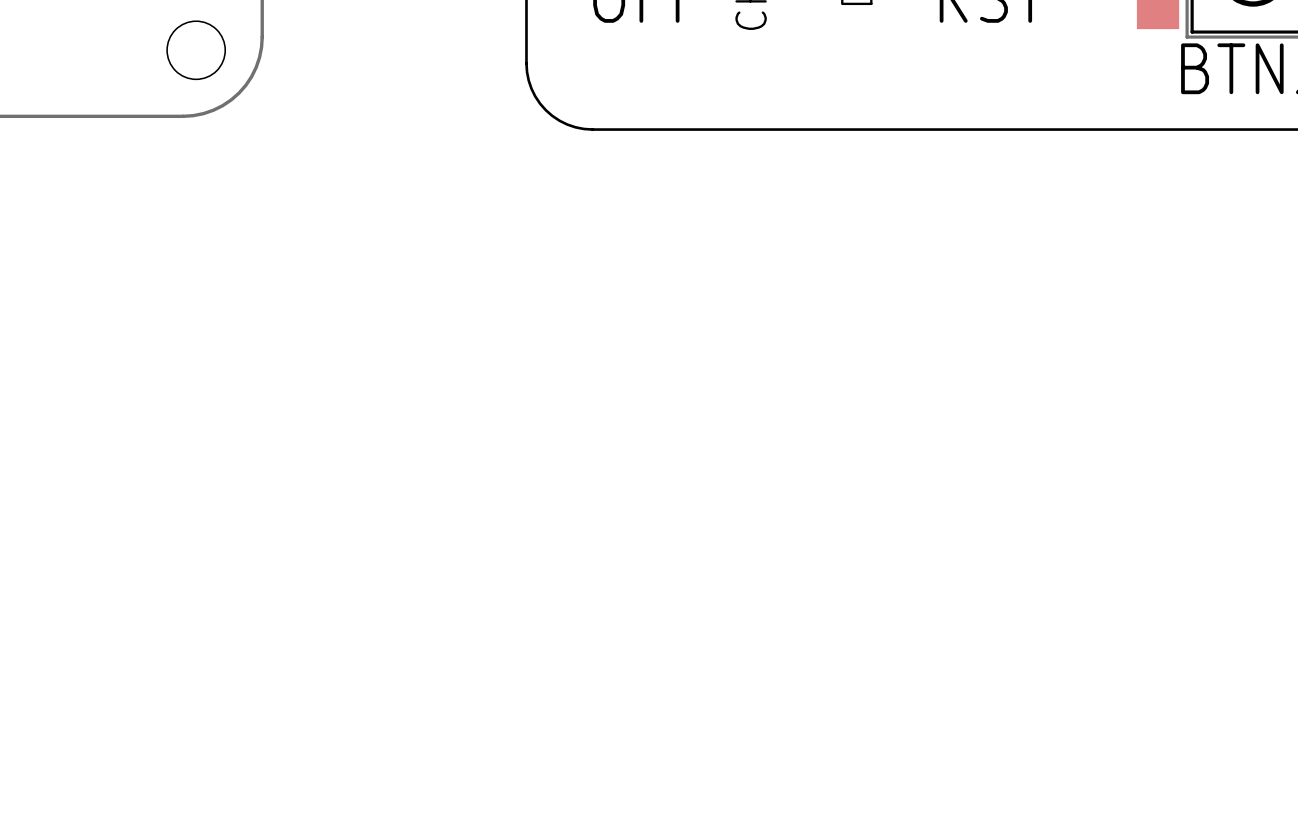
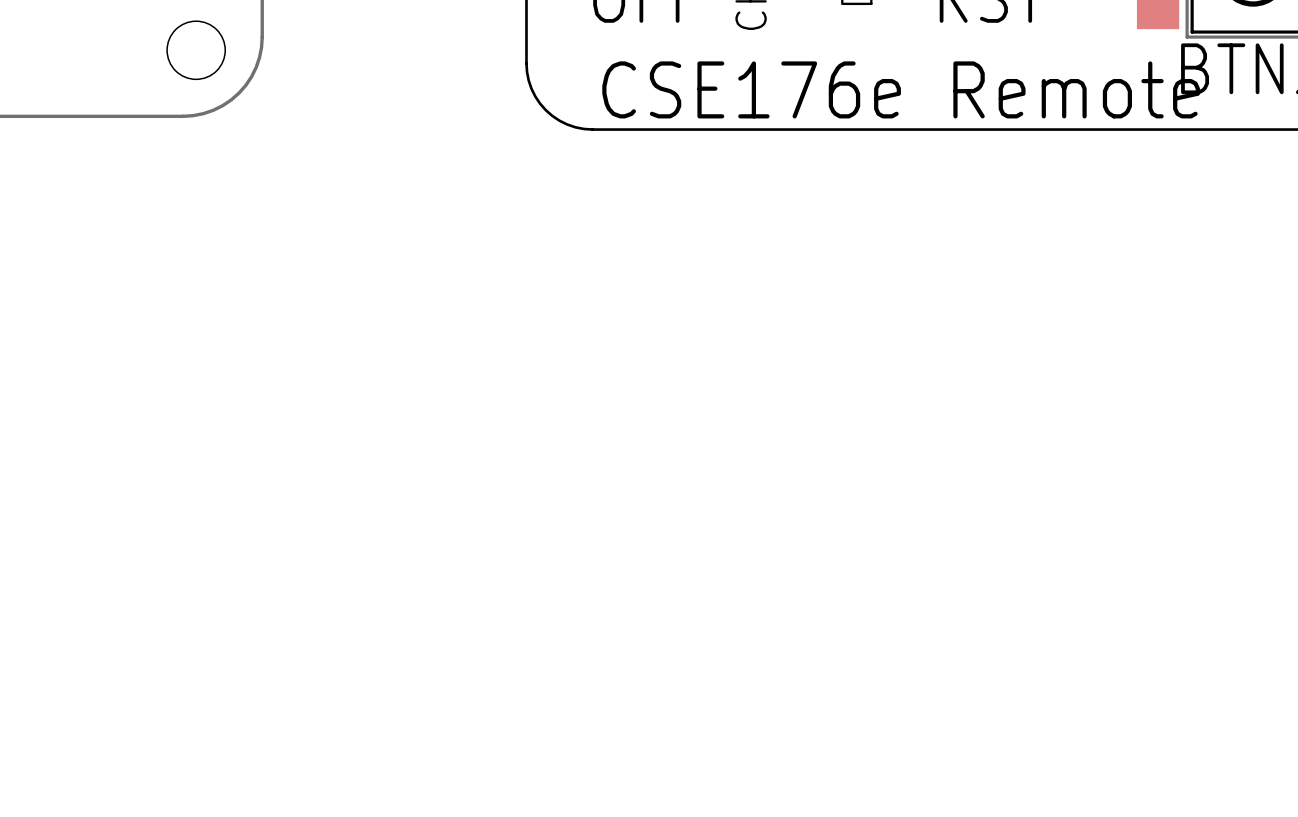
text: none -> CSE176e Remote (901, 89)

